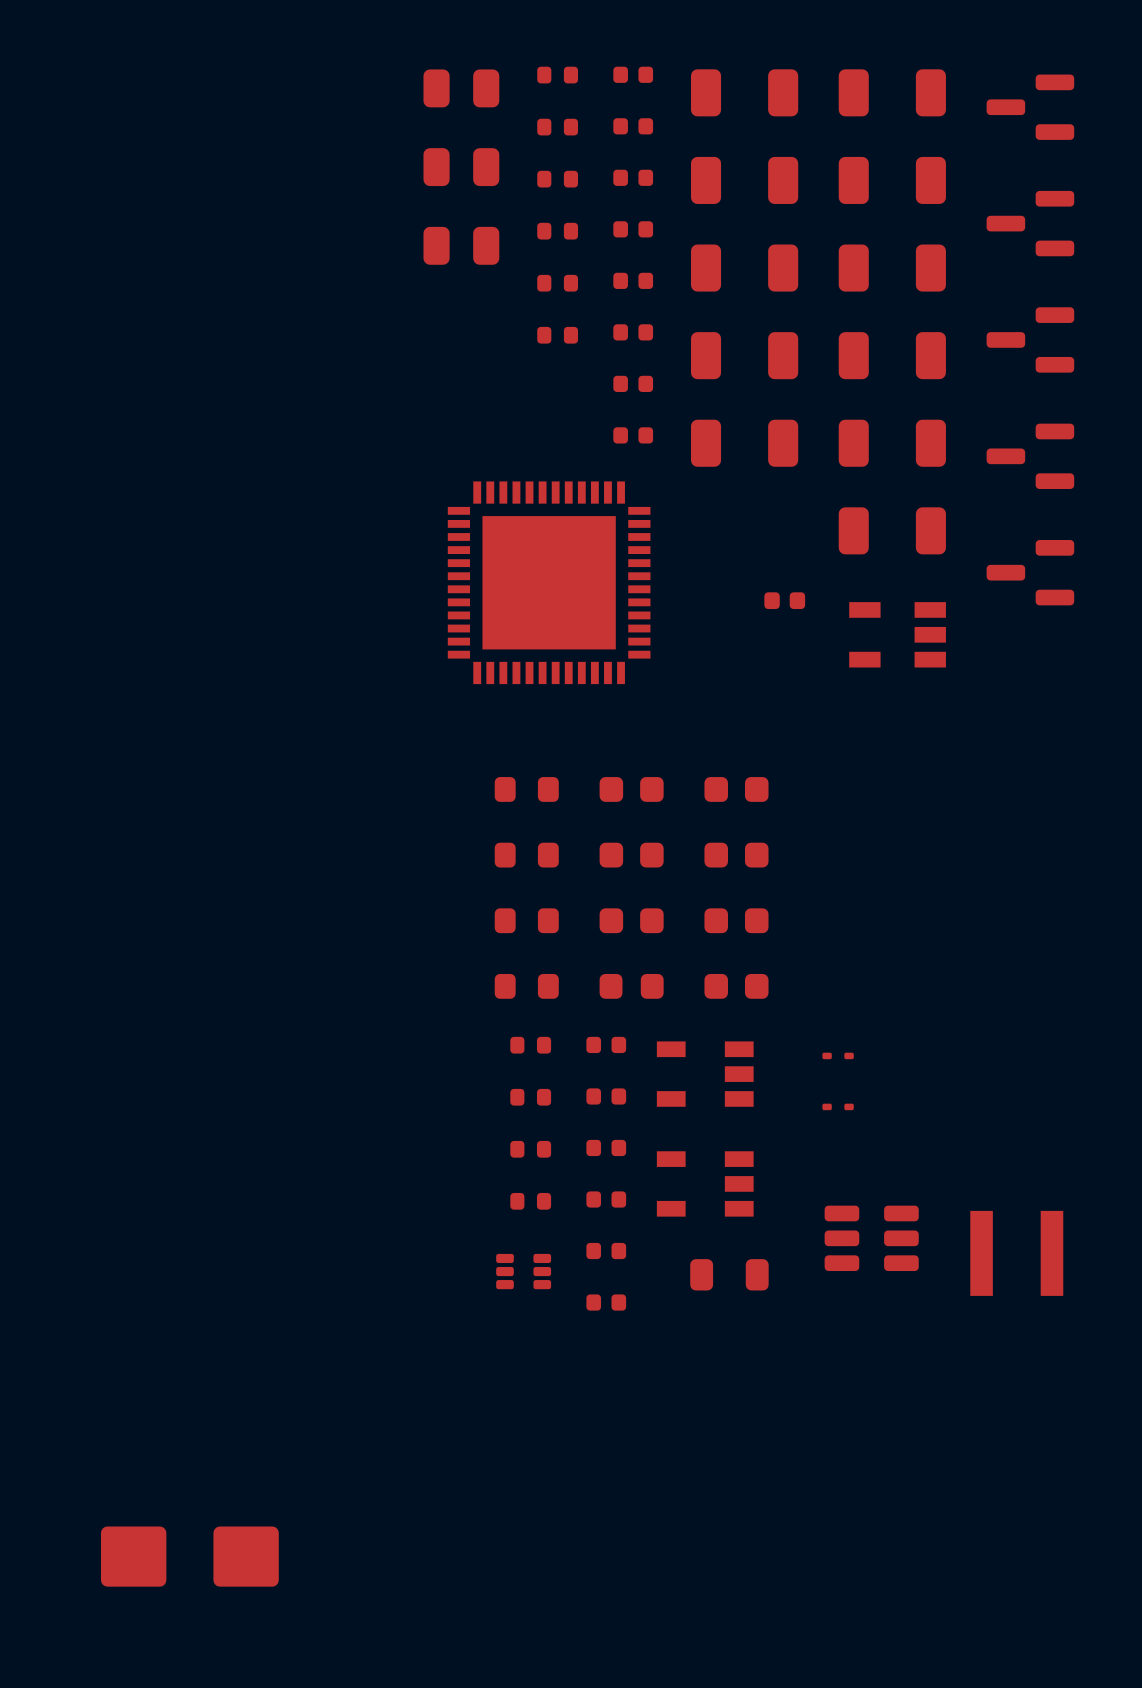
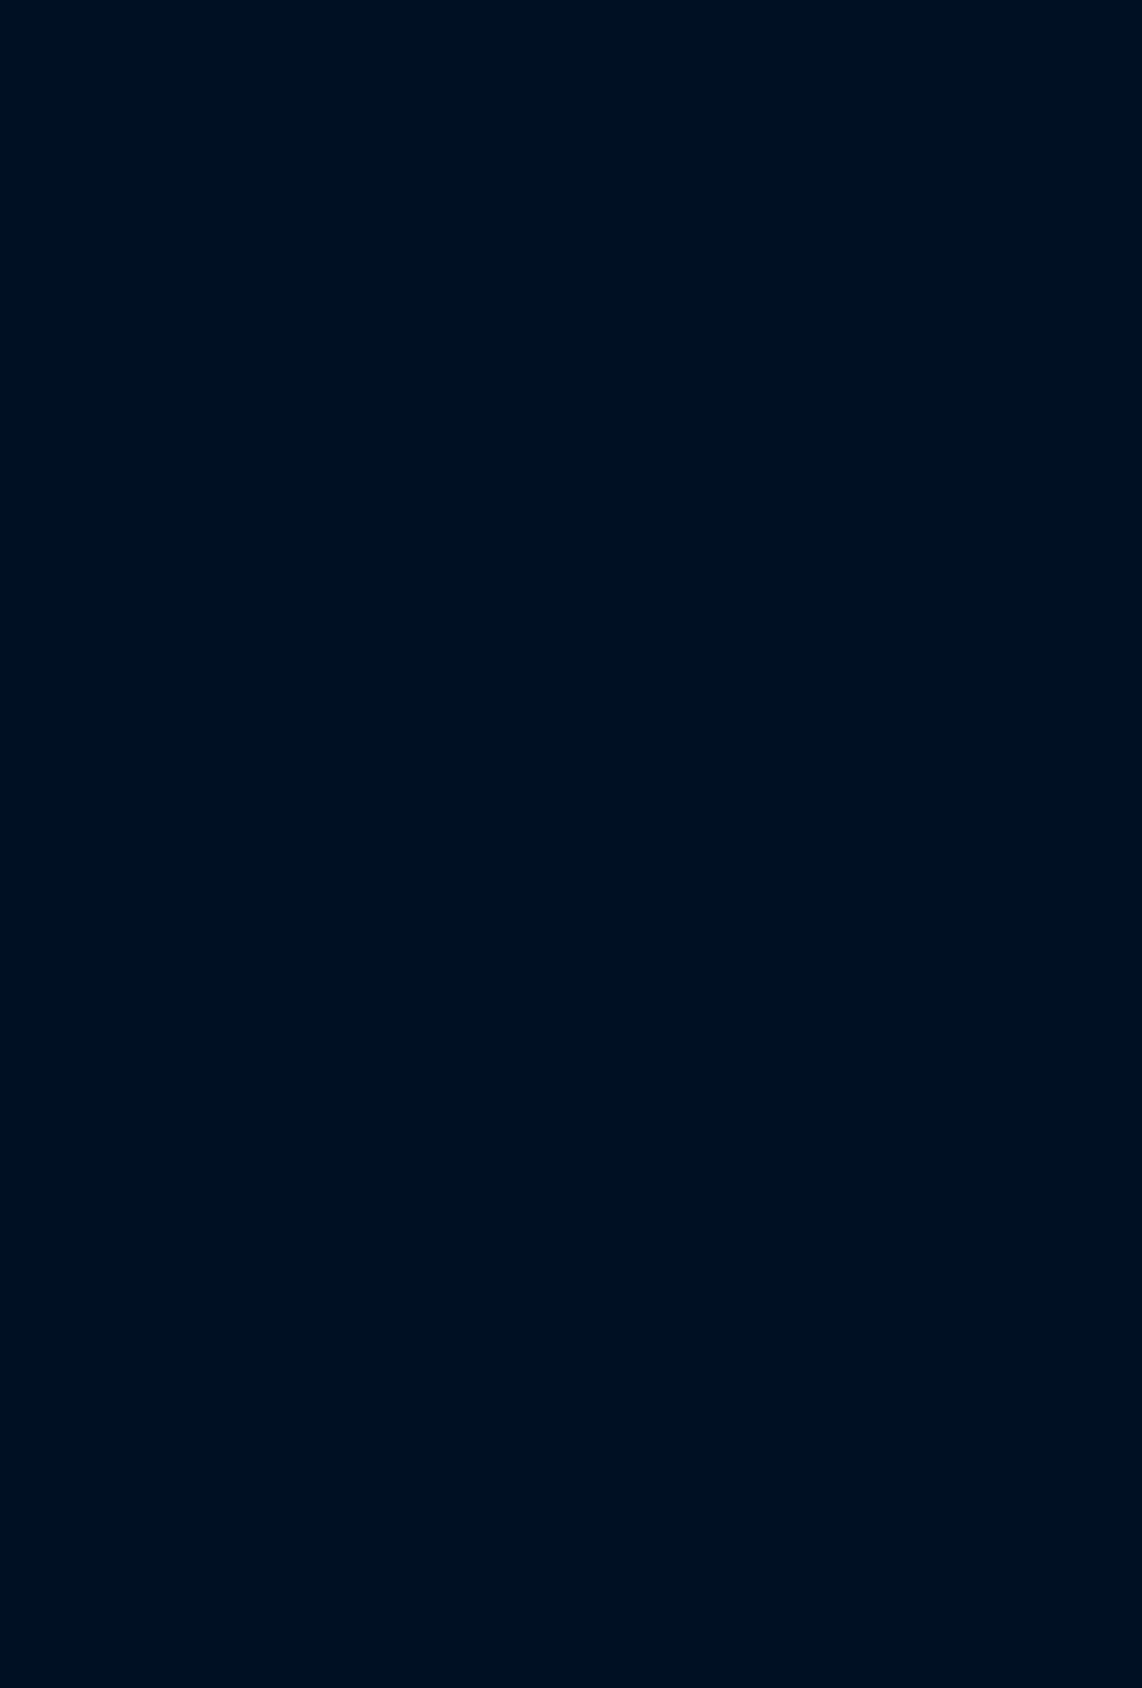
part: (633, 74) -> none
part: (557, 75) -> none
part: (461, 88) -> none
part: (744, 92) -> none
part: (892, 92) -> none
part: (1030, 107) -> none
part: (633, 126) -> none
part: (557, 127) -> none
part: (461, 167) -> none
part: (633, 177) -> none
part: (557, 179) -> none
part: (744, 180) -> none
part: (892, 180) -> none
part: (1030, 223) -> none
part: (633, 229) -> none
part: (557, 231) -> none
part: (461, 245) -> none
part: (744, 268) -> none
part: (892, 268) -> none
part: (633, 280) -> none
part: (557, 283) -> none
part: (633, 332) -> none
part: (557, 335) -> none
part: (1030, 339) -> none
part: (744, 355) -> none
part: (892, 355) -> none
part: (633, 383) -> none
part: (633, 435) -> none
part: (744, 443) -> none
part: (892, 443) -> none
part: (1030, 456) -> none
part: (892, 530) -> none
part: (1030, 572) -> none
part: (549, 582) -> none
part: (784, 600) -> none
part: (897, 634) -> none
part: (526, 789) -> none
part: (631, 789) -> none
part: (736, 789) -> none
part: (526, 855) -> none
part: (631, 855) -> none
part: (736, 855) -> none
part: (526, 920) -> none
part: (631, 920) -> none
part: (736, 920) -> none
part: (526, 986) -> none
part: (631, 986) -> none
part: (736, 986) -> none
part: (606, 1044) -> none
part: (530, 1045) -> none
part: (838, 1055) -> none
part: (705, 1074) -> none
part: (606, 1096) -> none
part: (530, 1097) -> none
part: (838, 1106) -> none
part: (606, 1147) -> none
part: (530, 1149) -> none
part: (705, 1183) -> none
part: (606, 1199) -> none
part: (530, 1201) -> none
part: (871, 1238) -> none
part: (606, 1251) -> none
part: (1016, 1253) -> none
part: (523, 1271) -> none
part: (729, 1274) -> none
part: (606, 1302) -> none
part: (189, 1556) -> none

